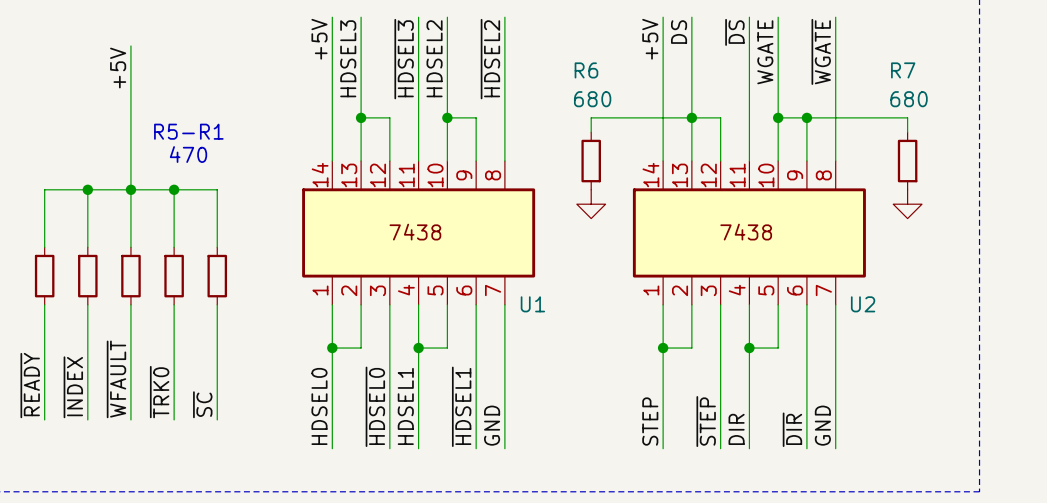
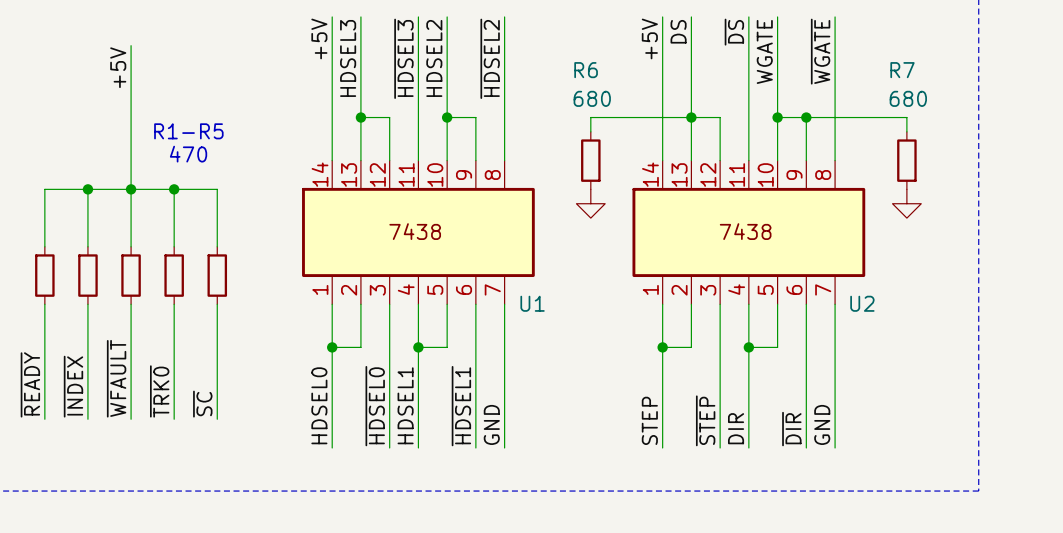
text: R5-R1 (188, 131) -> R1-R5 (188, 131)

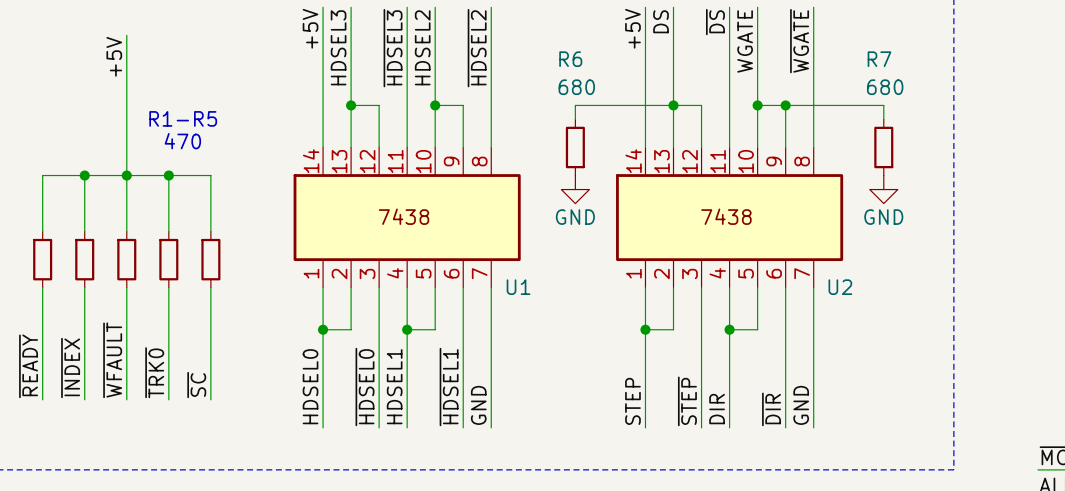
power symbol text: none -> GND (575, 217)
power symbol text: none -> GND (883, 217)

